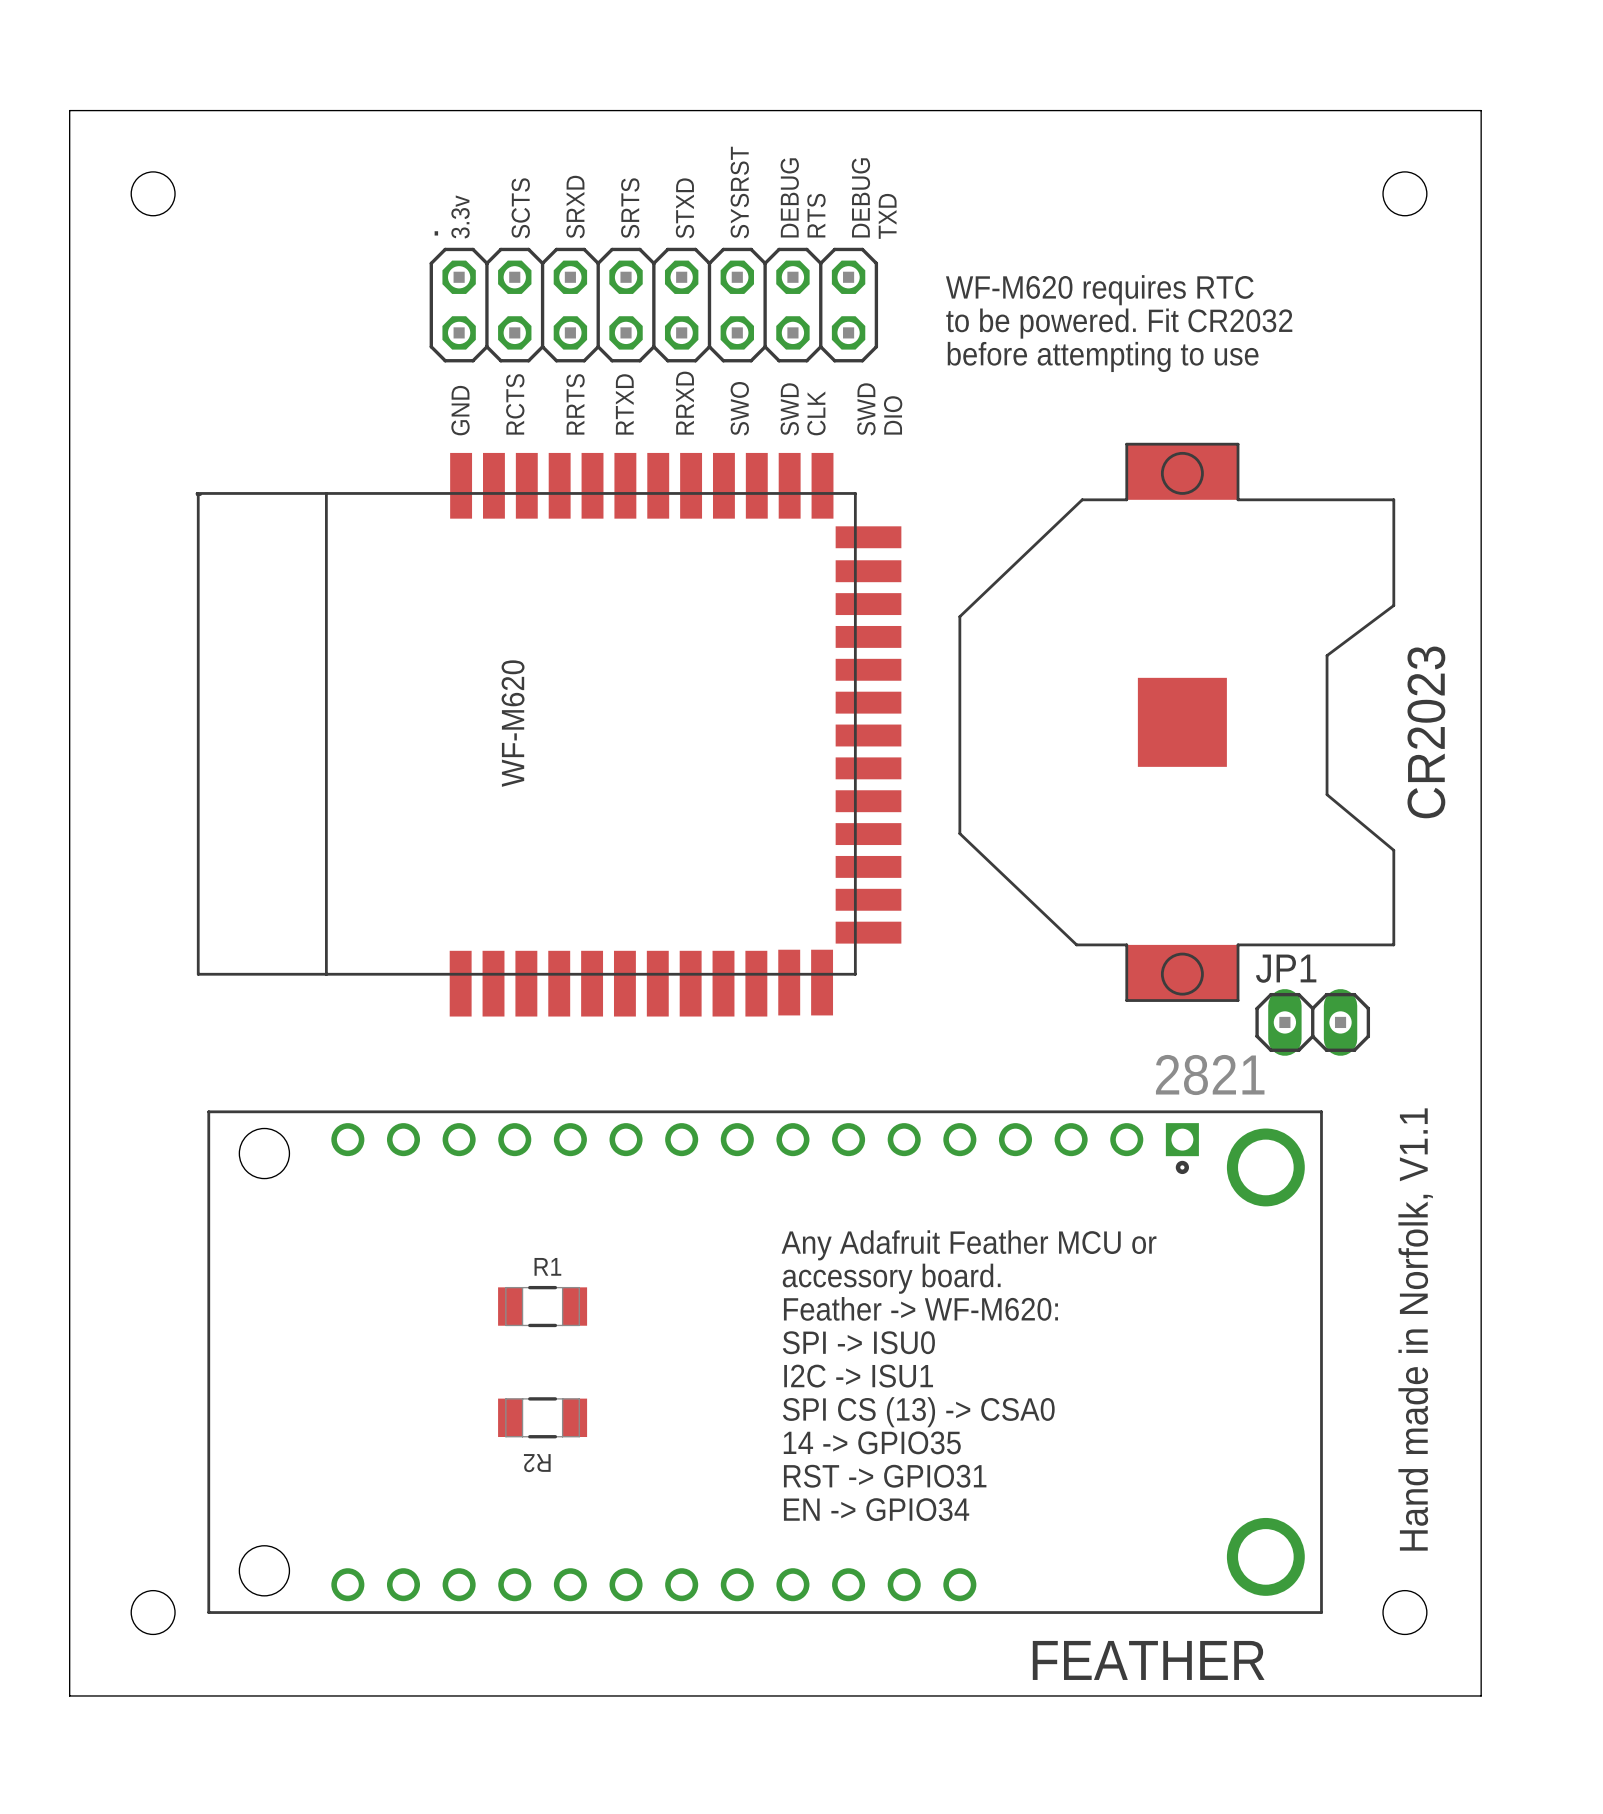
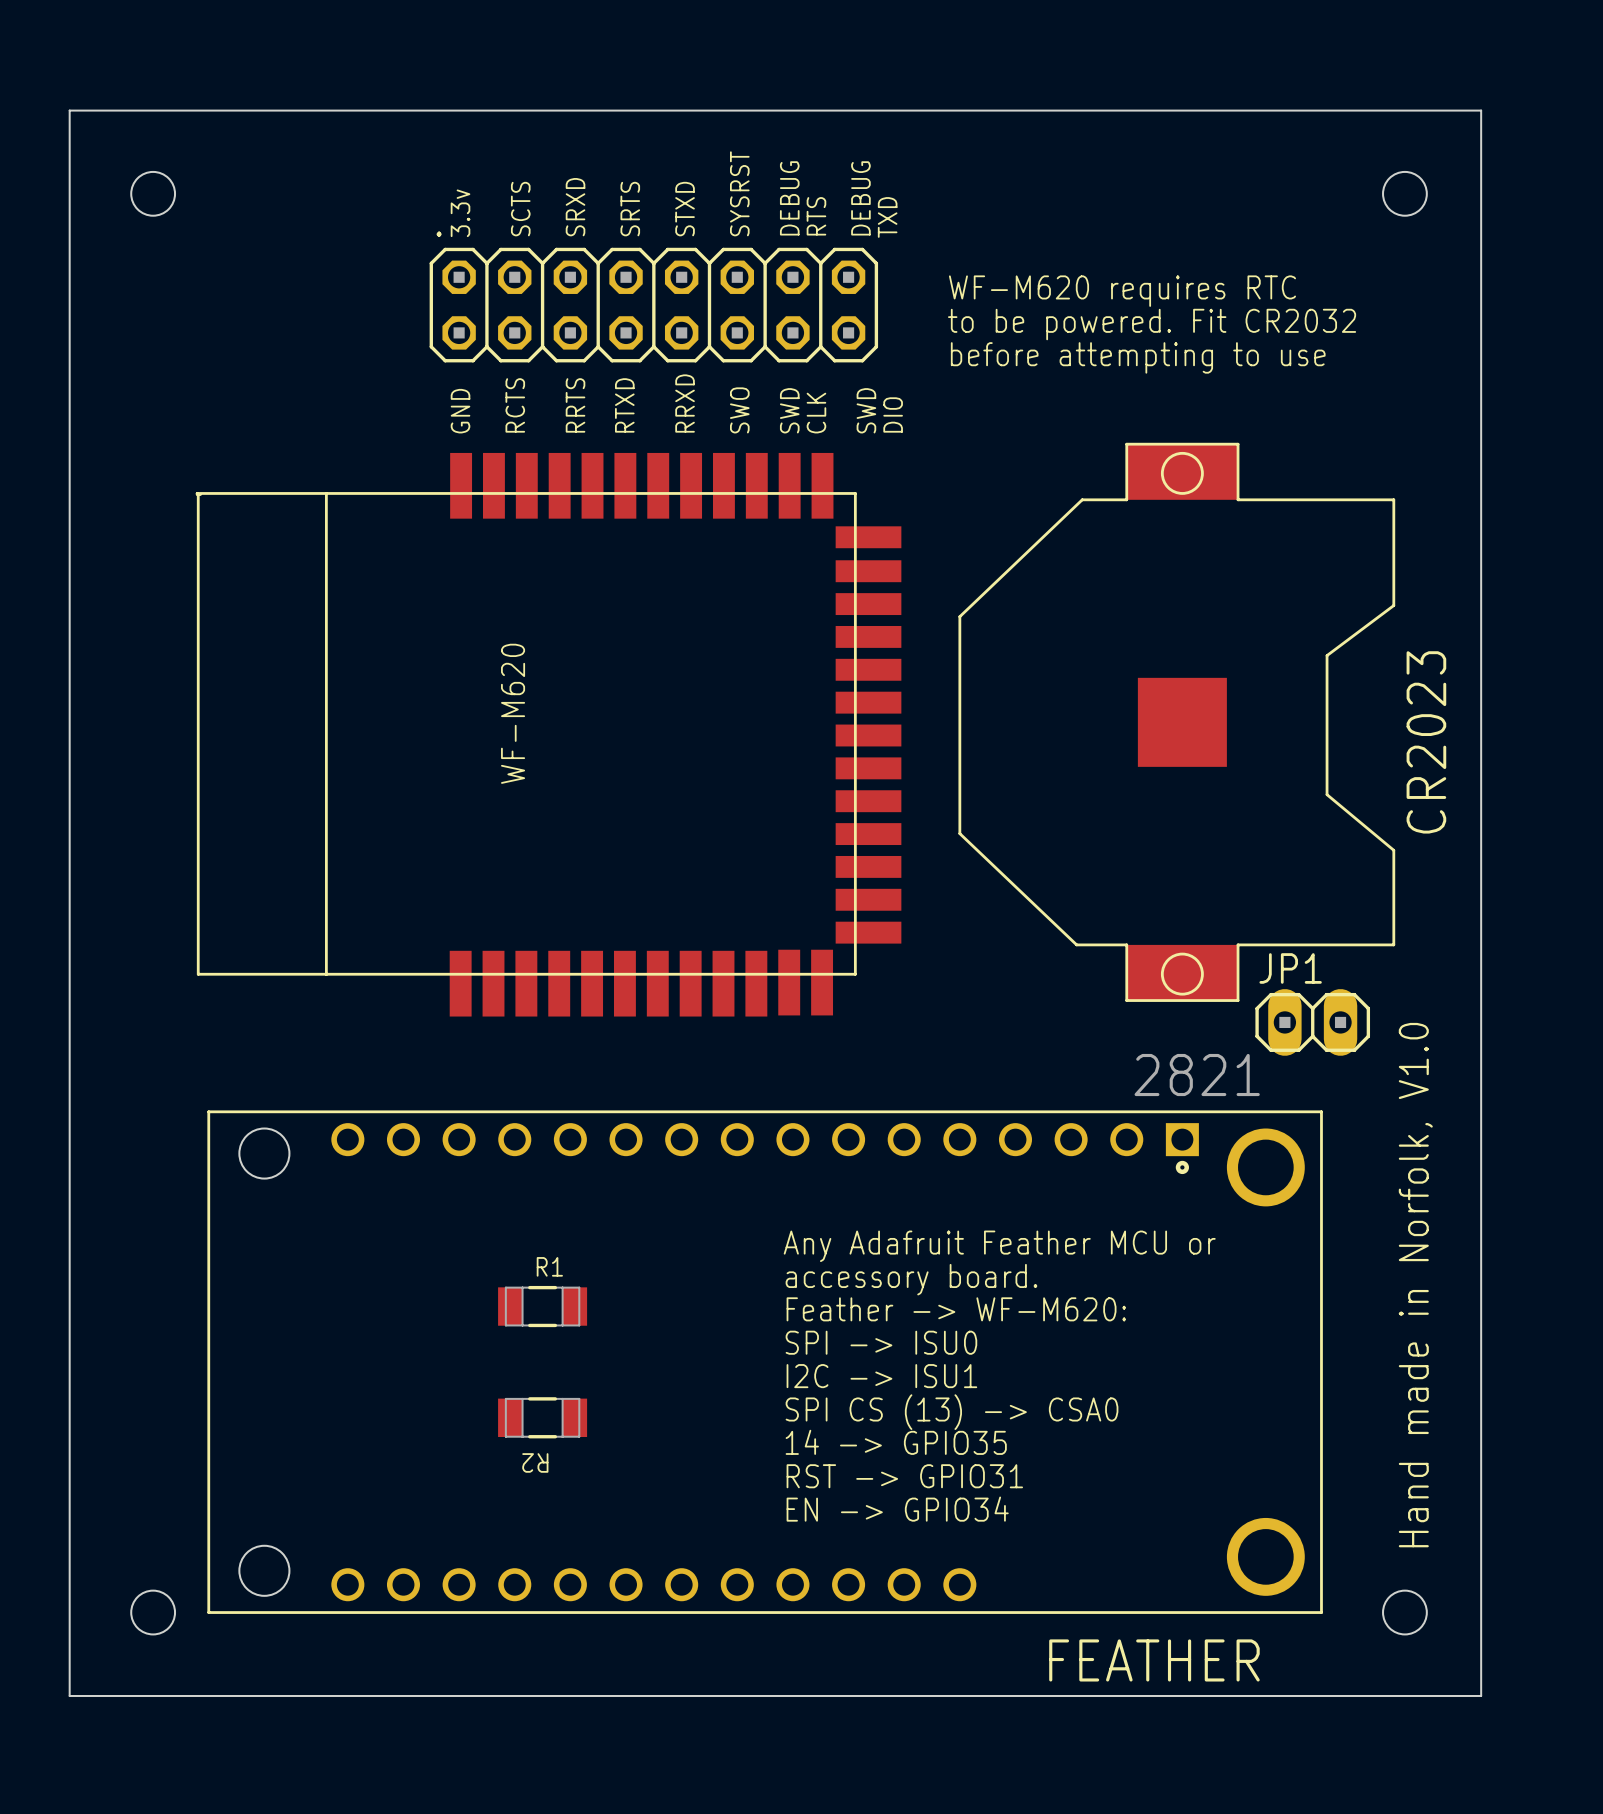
text: Hand made in Norfolk, V1.1 (1415, 1329) -> Hand made in Norfolk, V1.0 (1415, 1285)

